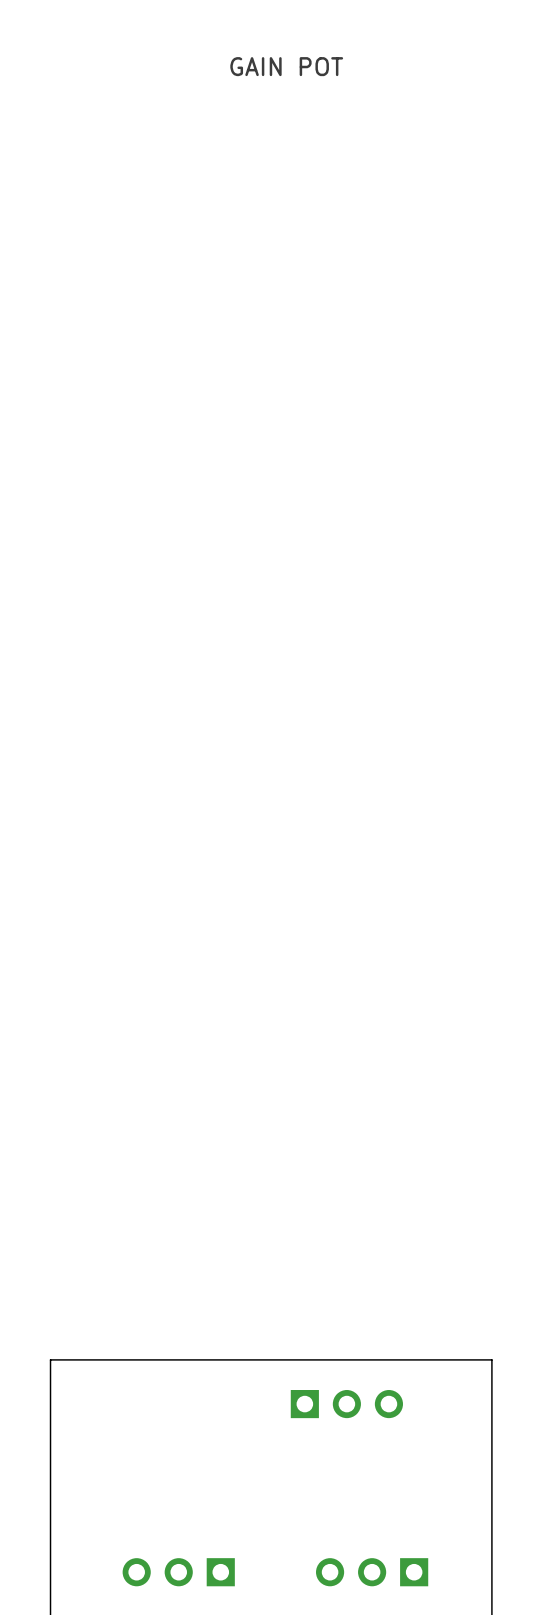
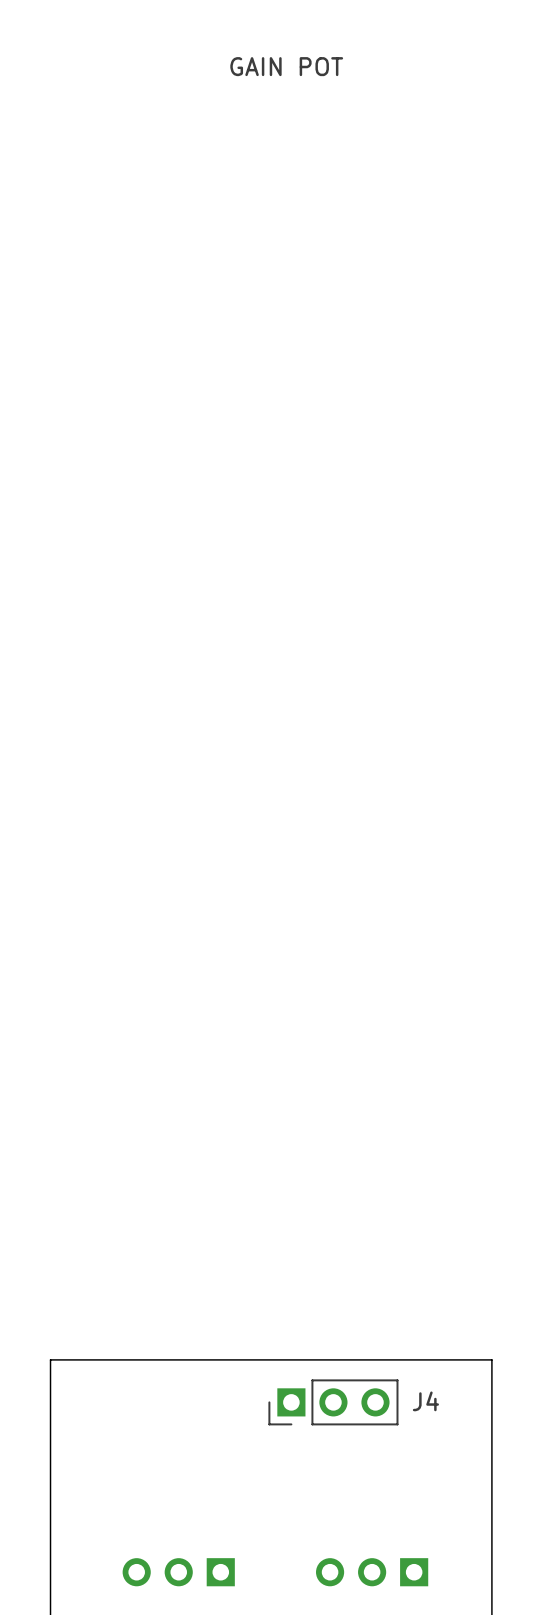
J4 side: top (346, 1404) -> bottom (333, 1402)

